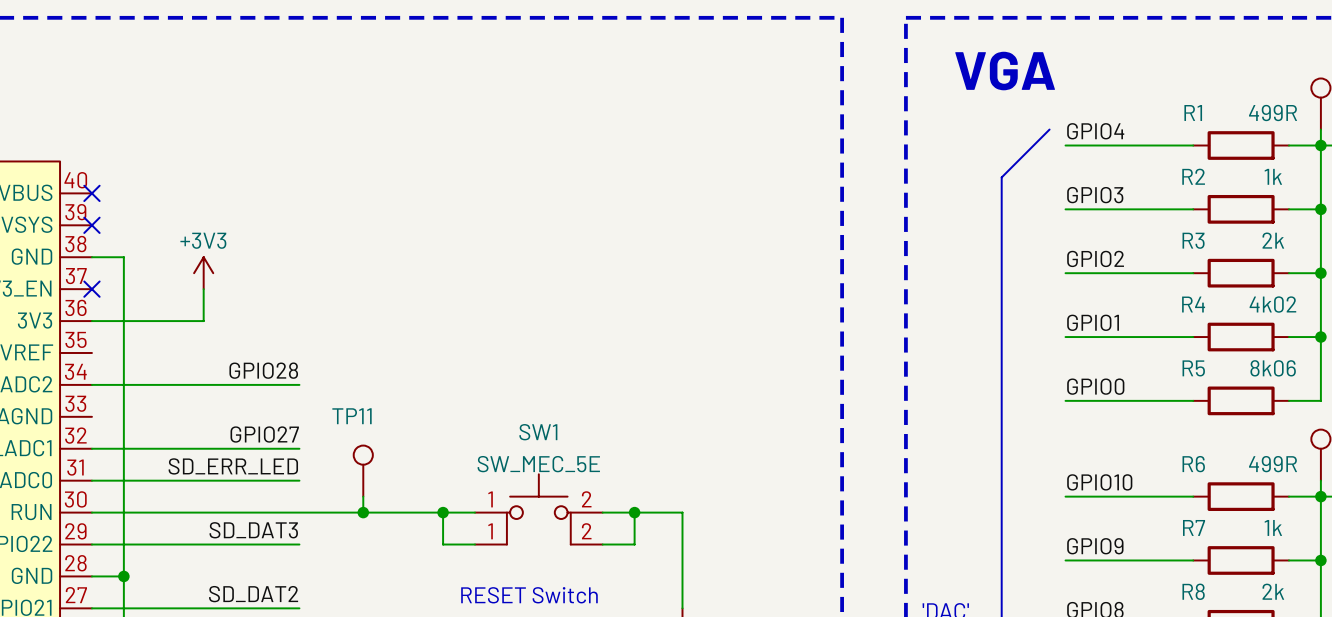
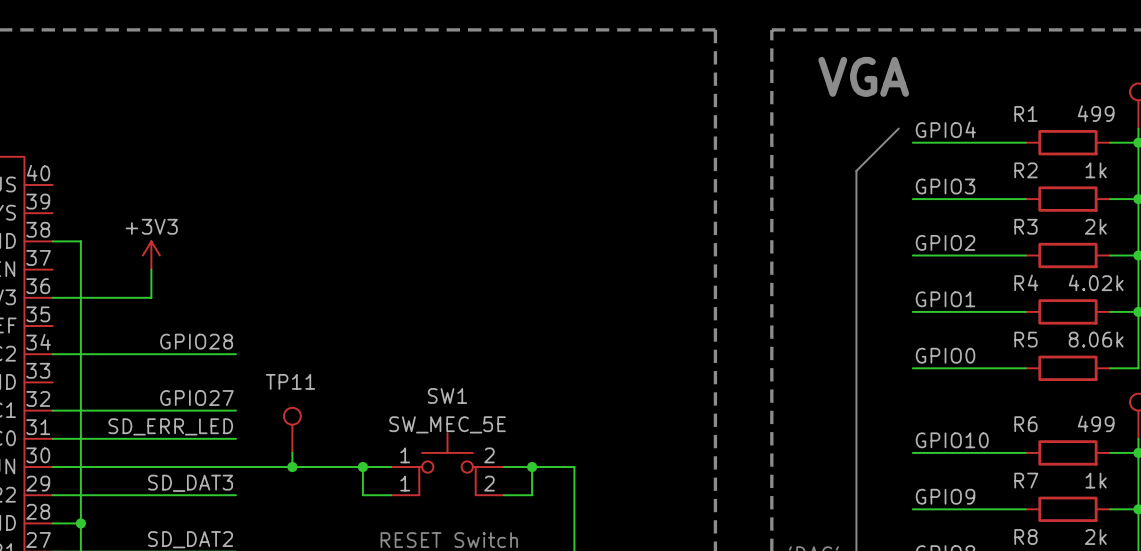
R1 value: 499R (1273, 113) -> 499 (1096, 113)
no-connect mark: (91, 193) -> none
no-connect mark: (91, 225) -> none
no-connect mark: (91, 289) -> none
R4 value: 4k02 (1272, 304) -> 4.02k (1096, 282)
R5 value: 8k06 (1273, 368) -> 8.06k (1096, 339)
R6 value: 499R (1273, 464) -> 499 (1096, 423)

